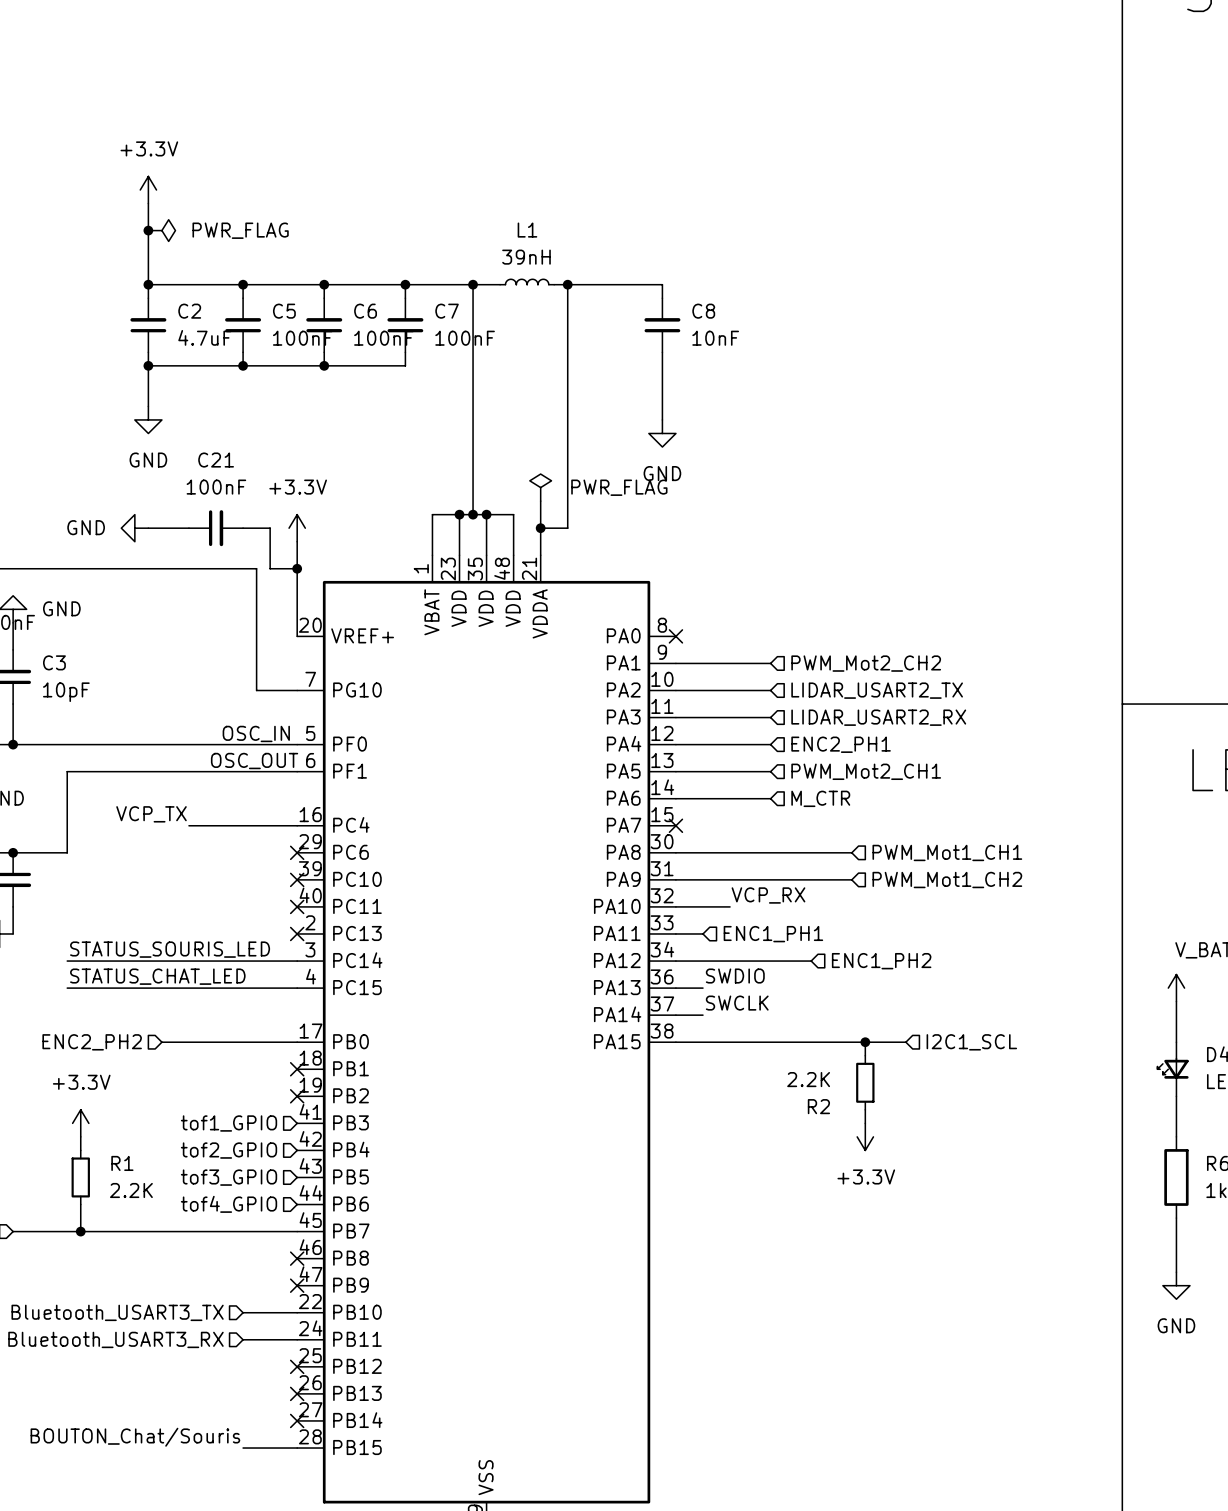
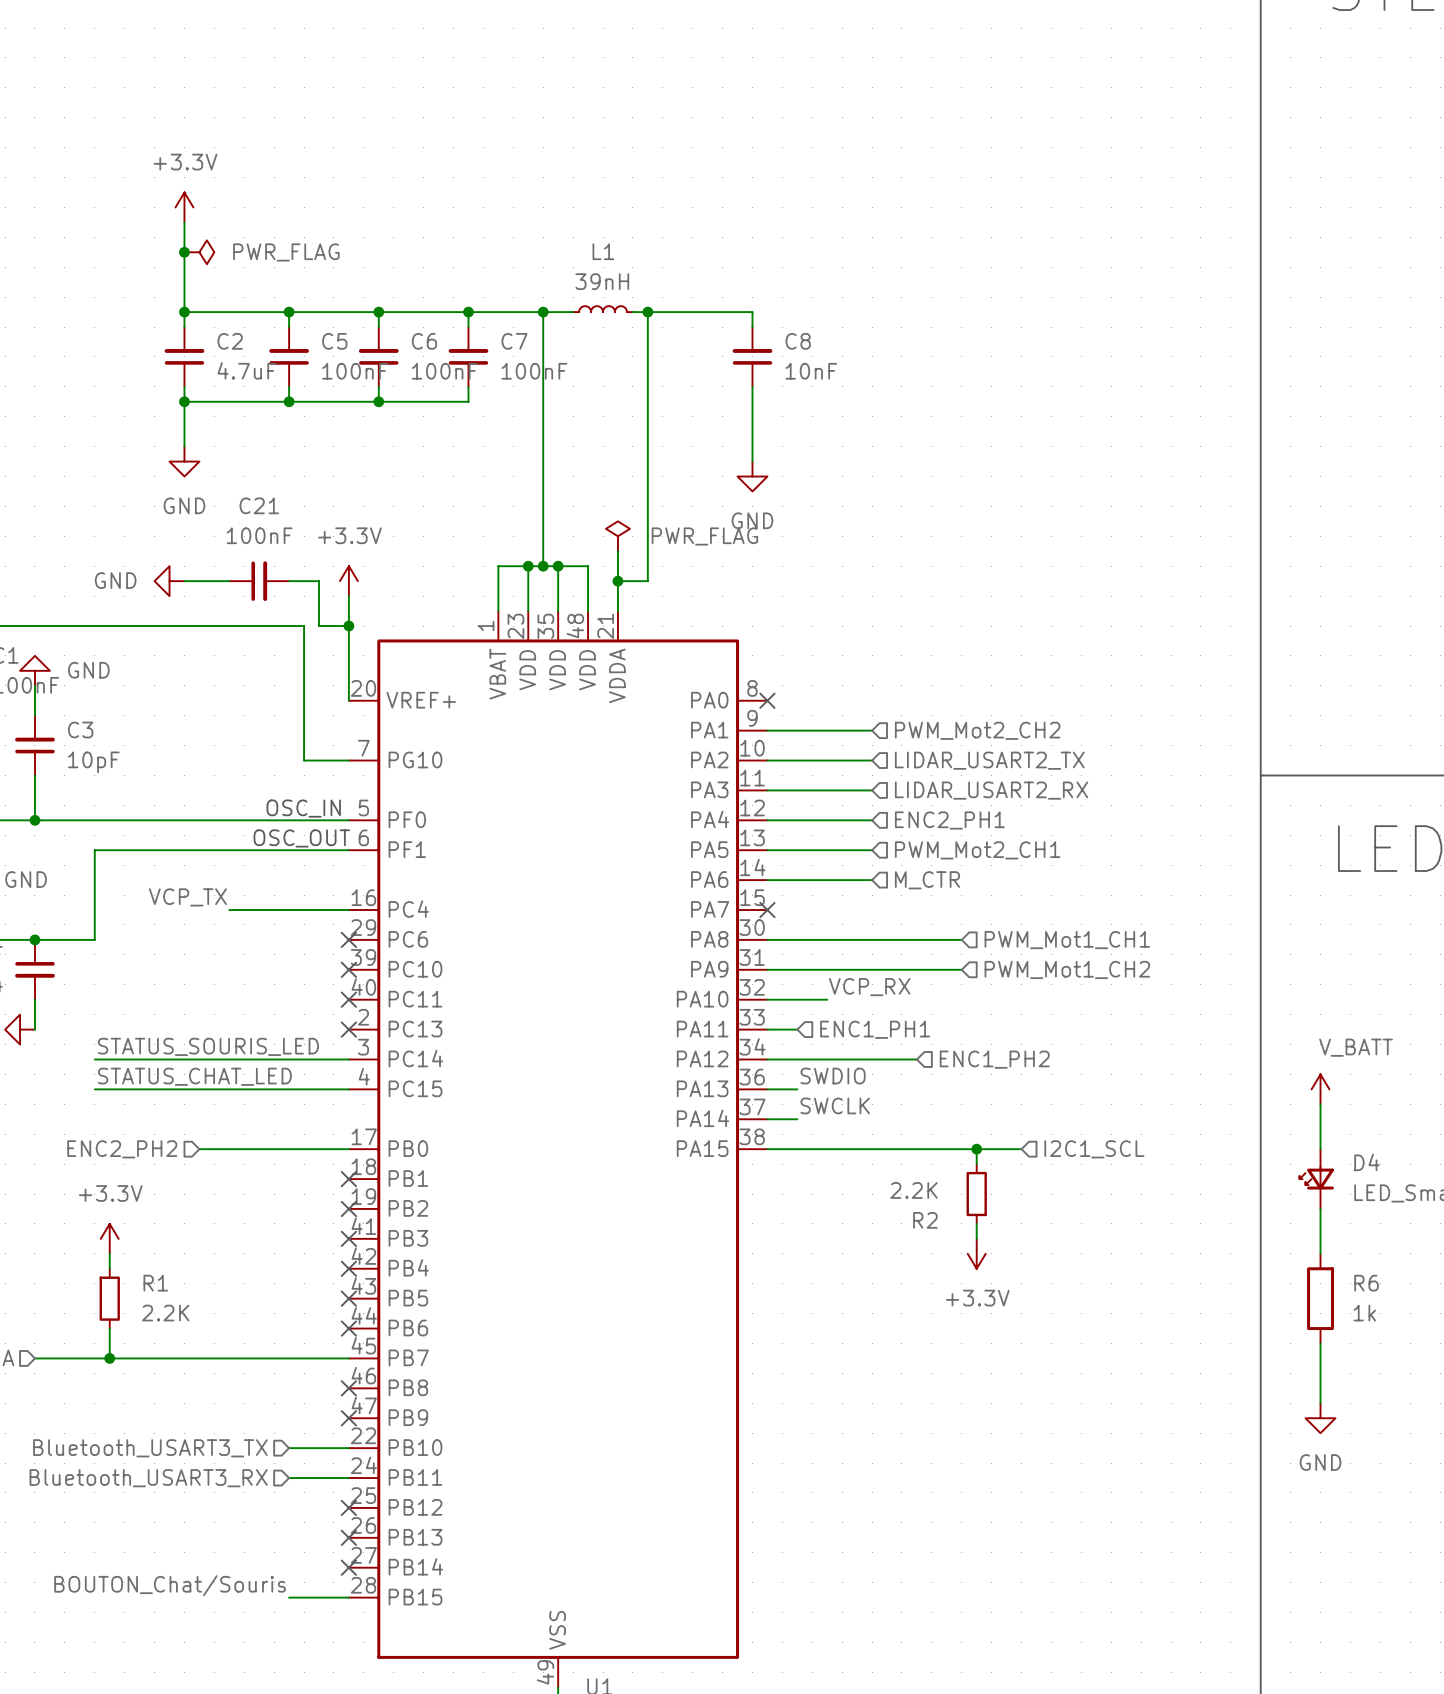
hierarchical label: tof1_GPIO (229, 1123) -> none
no-connect mark: none -> (348, 1238)
hierarchical label: tof2_GPIO (229, 1150) -> none
no-connect mark: none -> (348, 1268)
hierarchical label: tof3_GPIO (229, 1177) -> none
no-connect mark: none -> (348, 1298)
hierarchical label: tof4_GPIO (229, 1204) -> none
no-connect mark: none -> (348, 1328)

